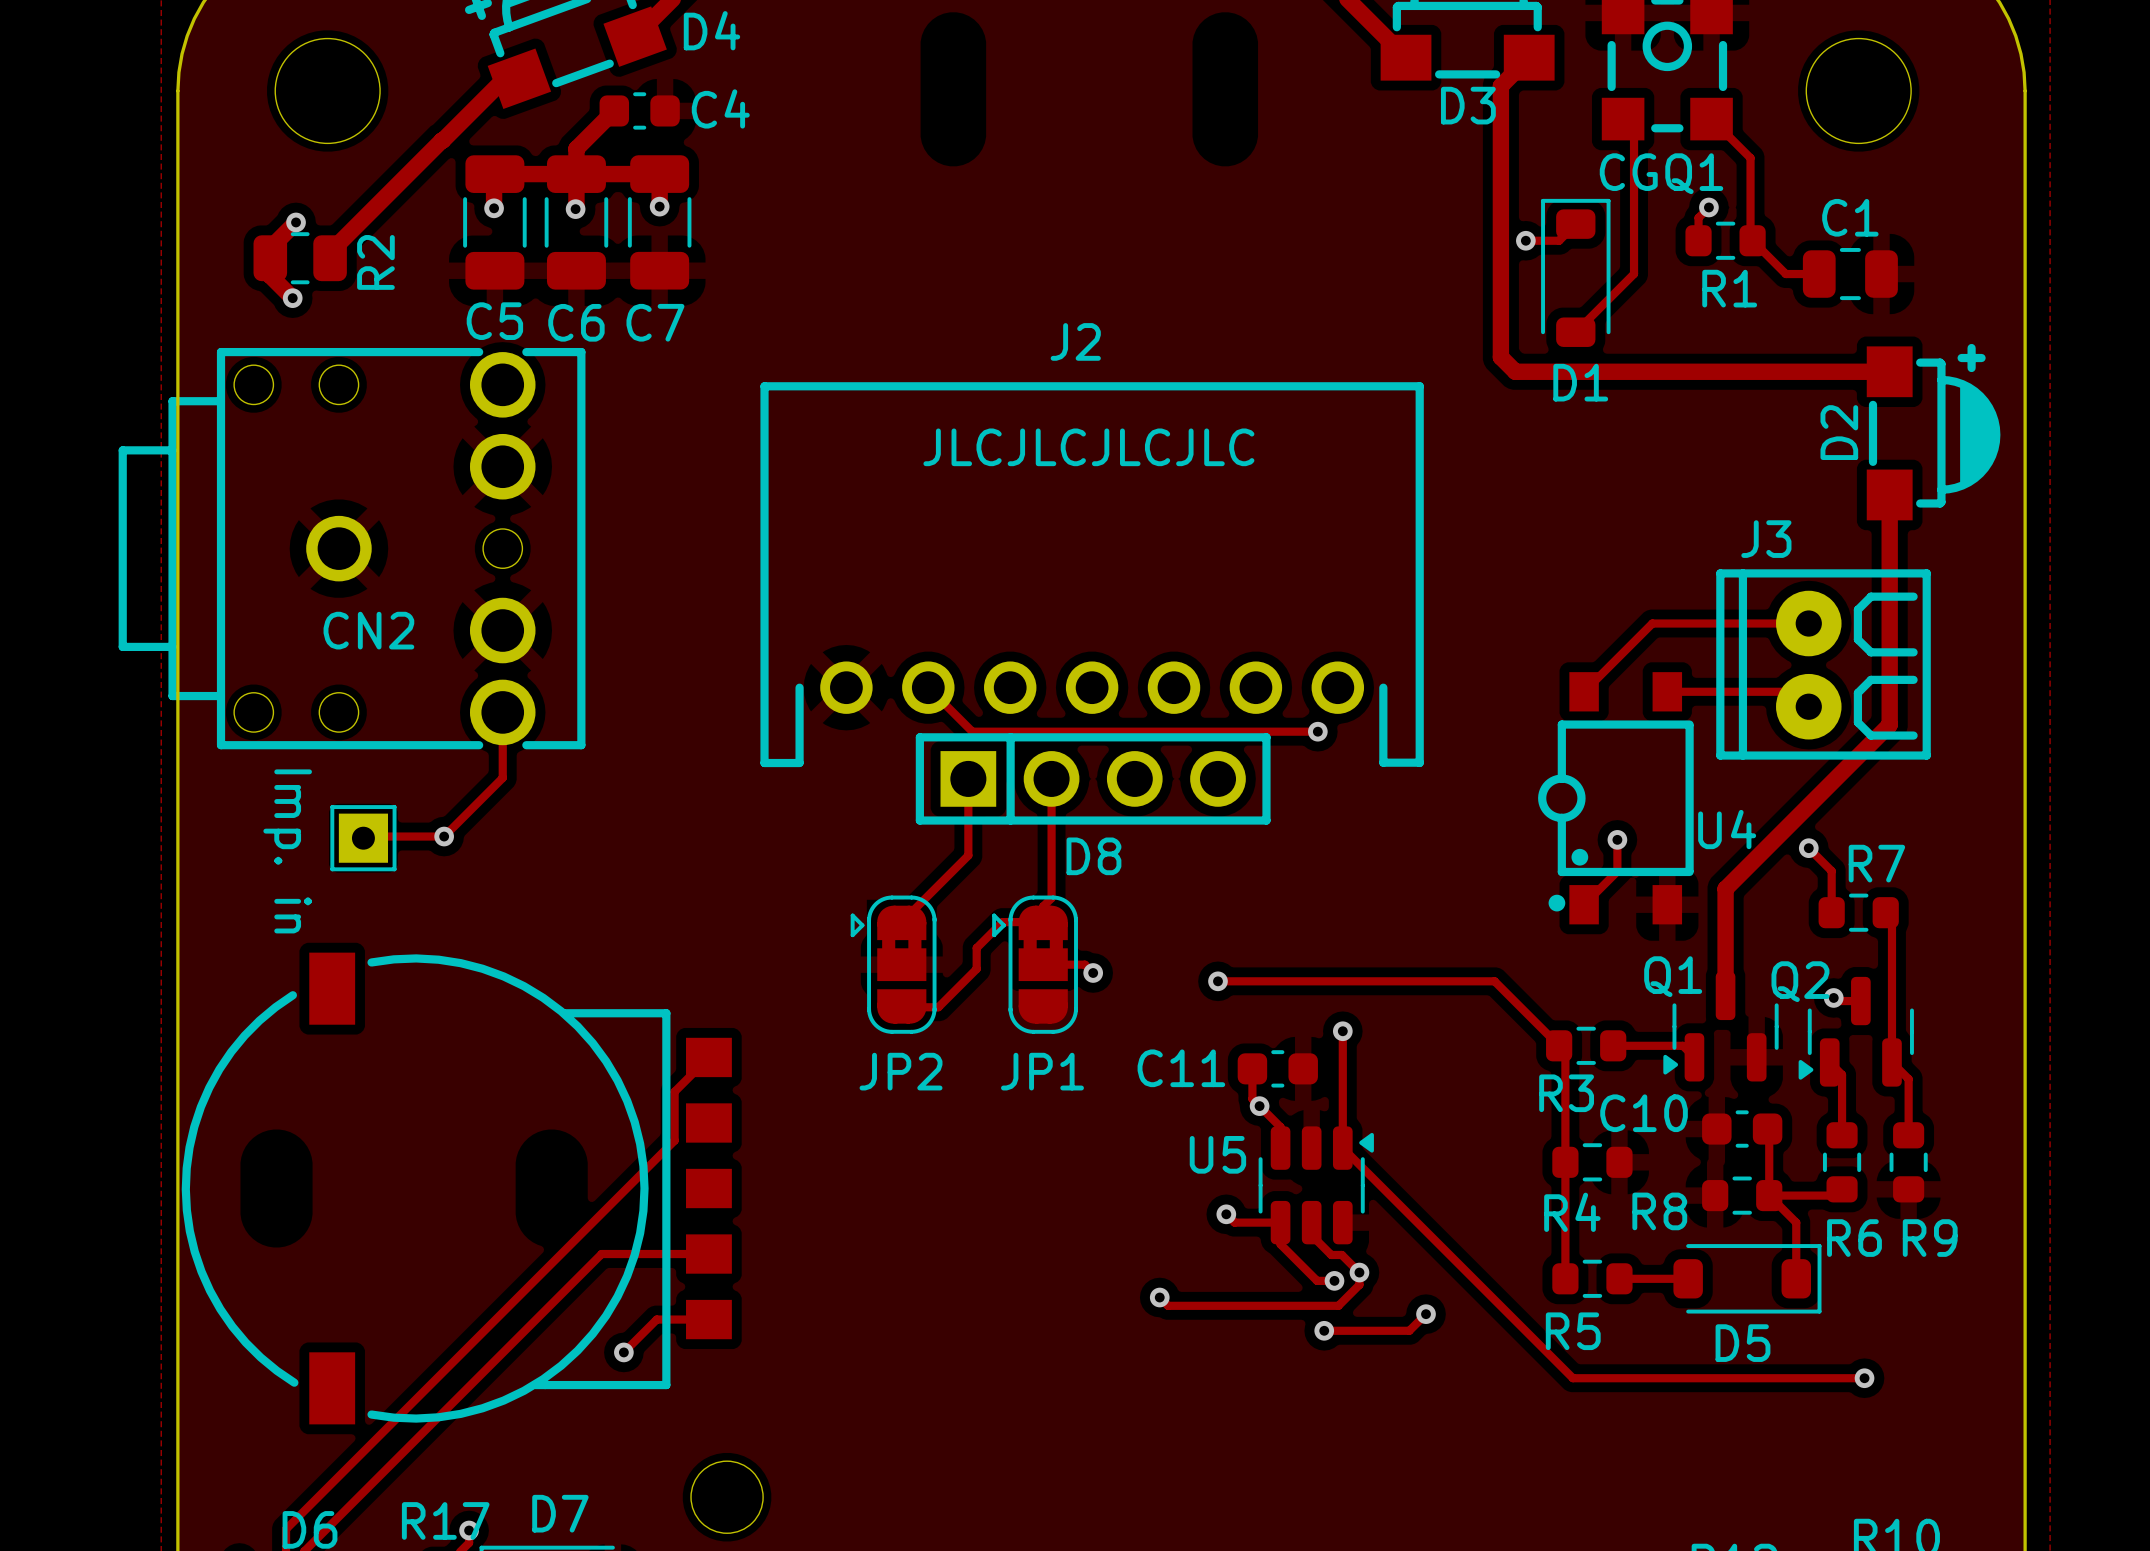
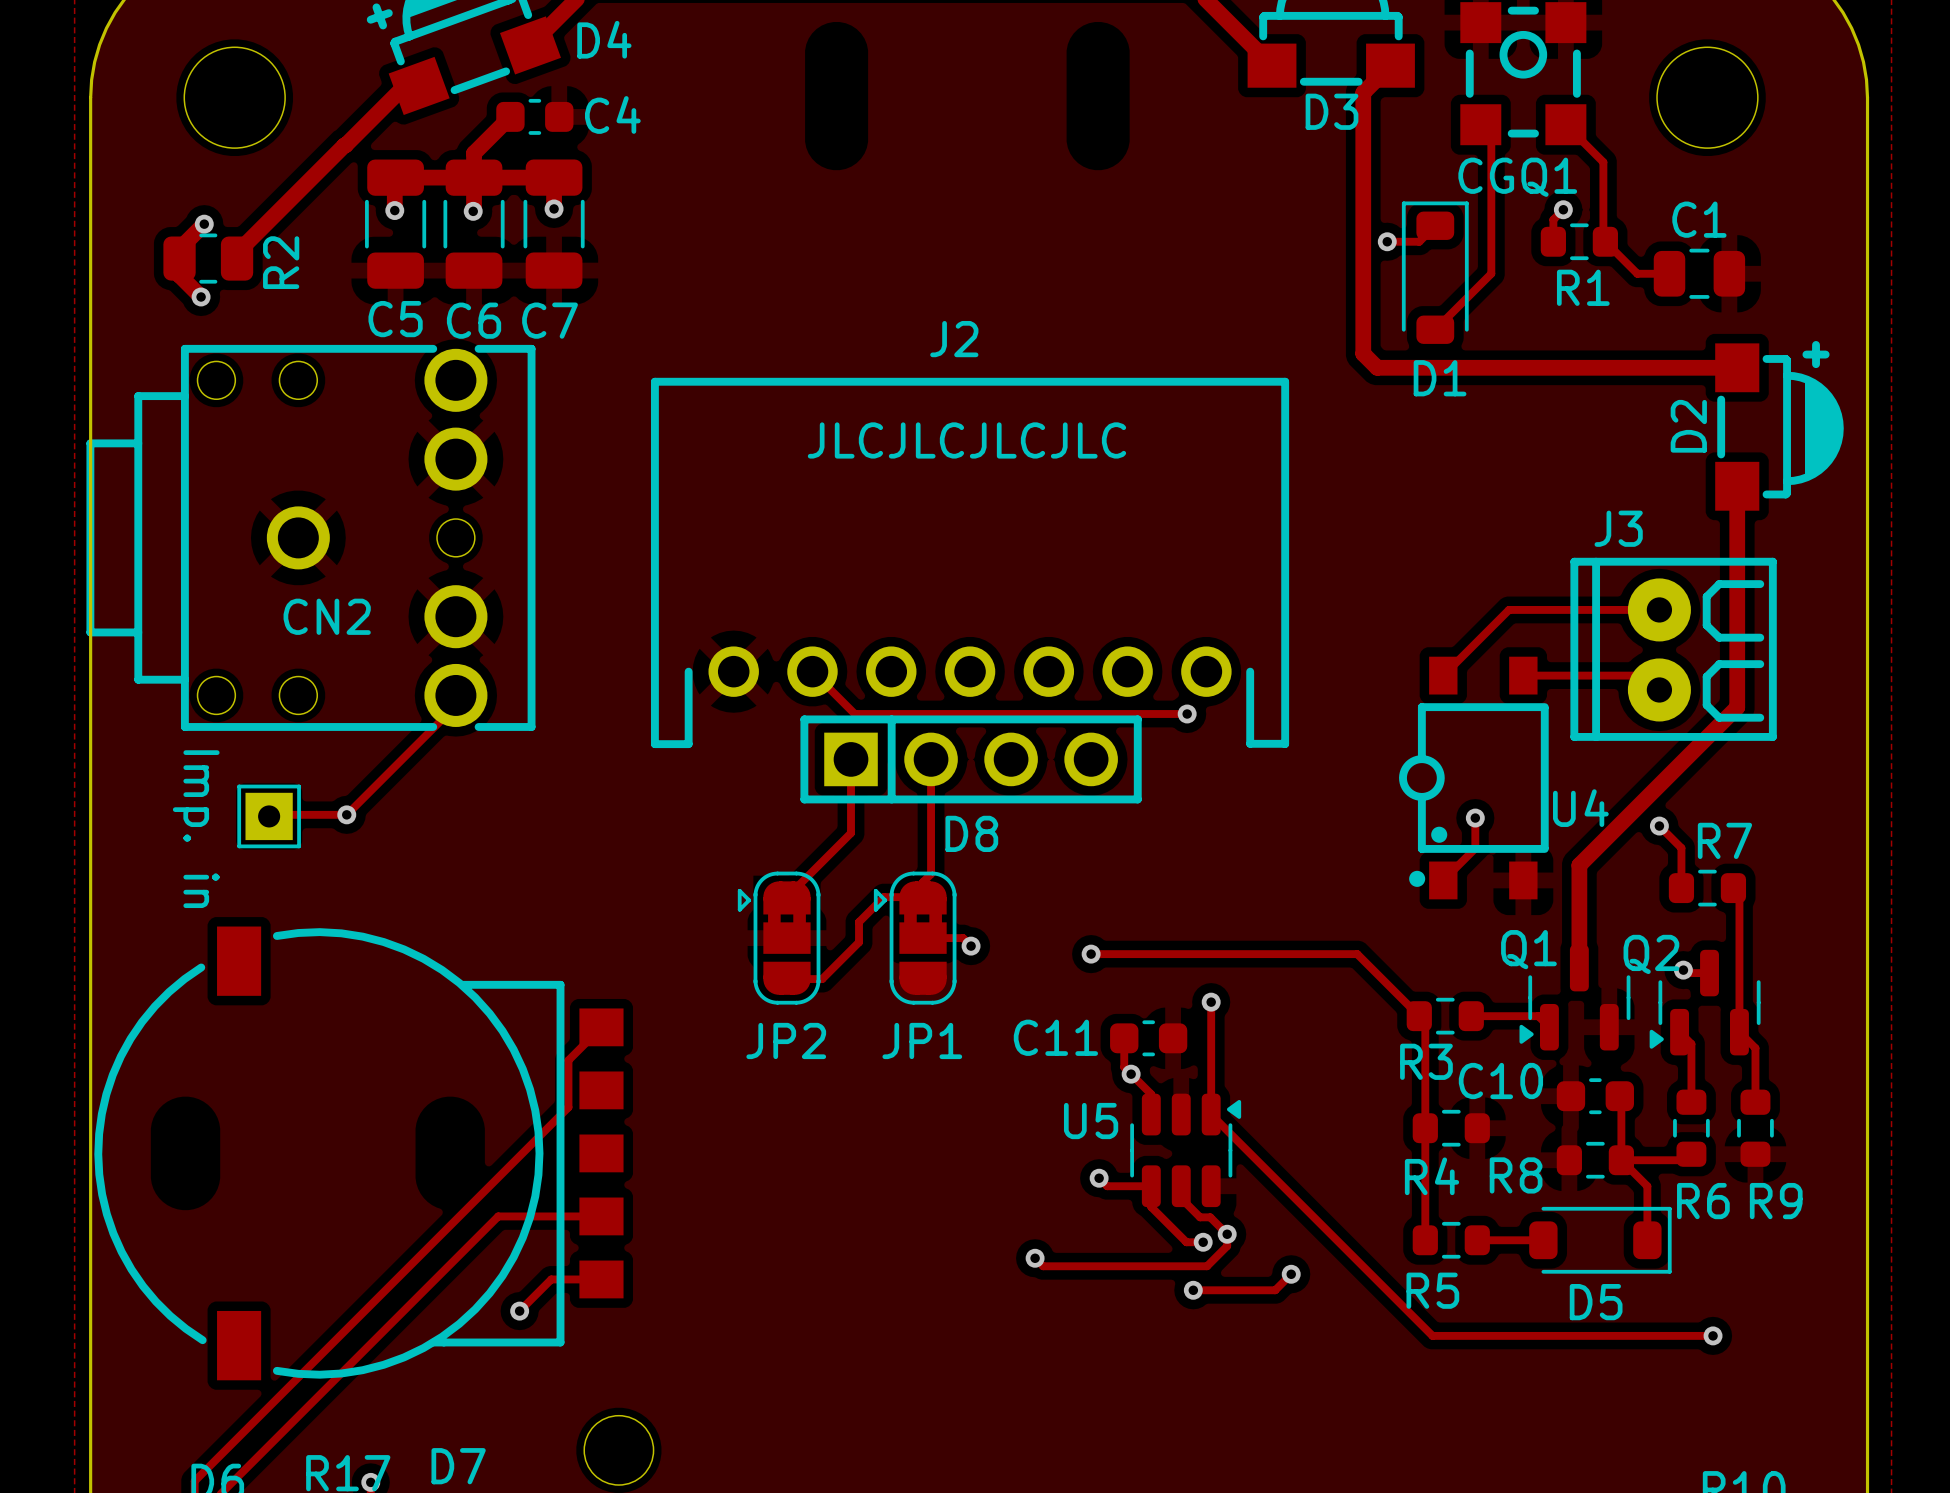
CN2 position: (352, 548) -> (310, 537)
track: (502, 712) (502, 777) -> (455, 695) (455, 705) (403, 758)

